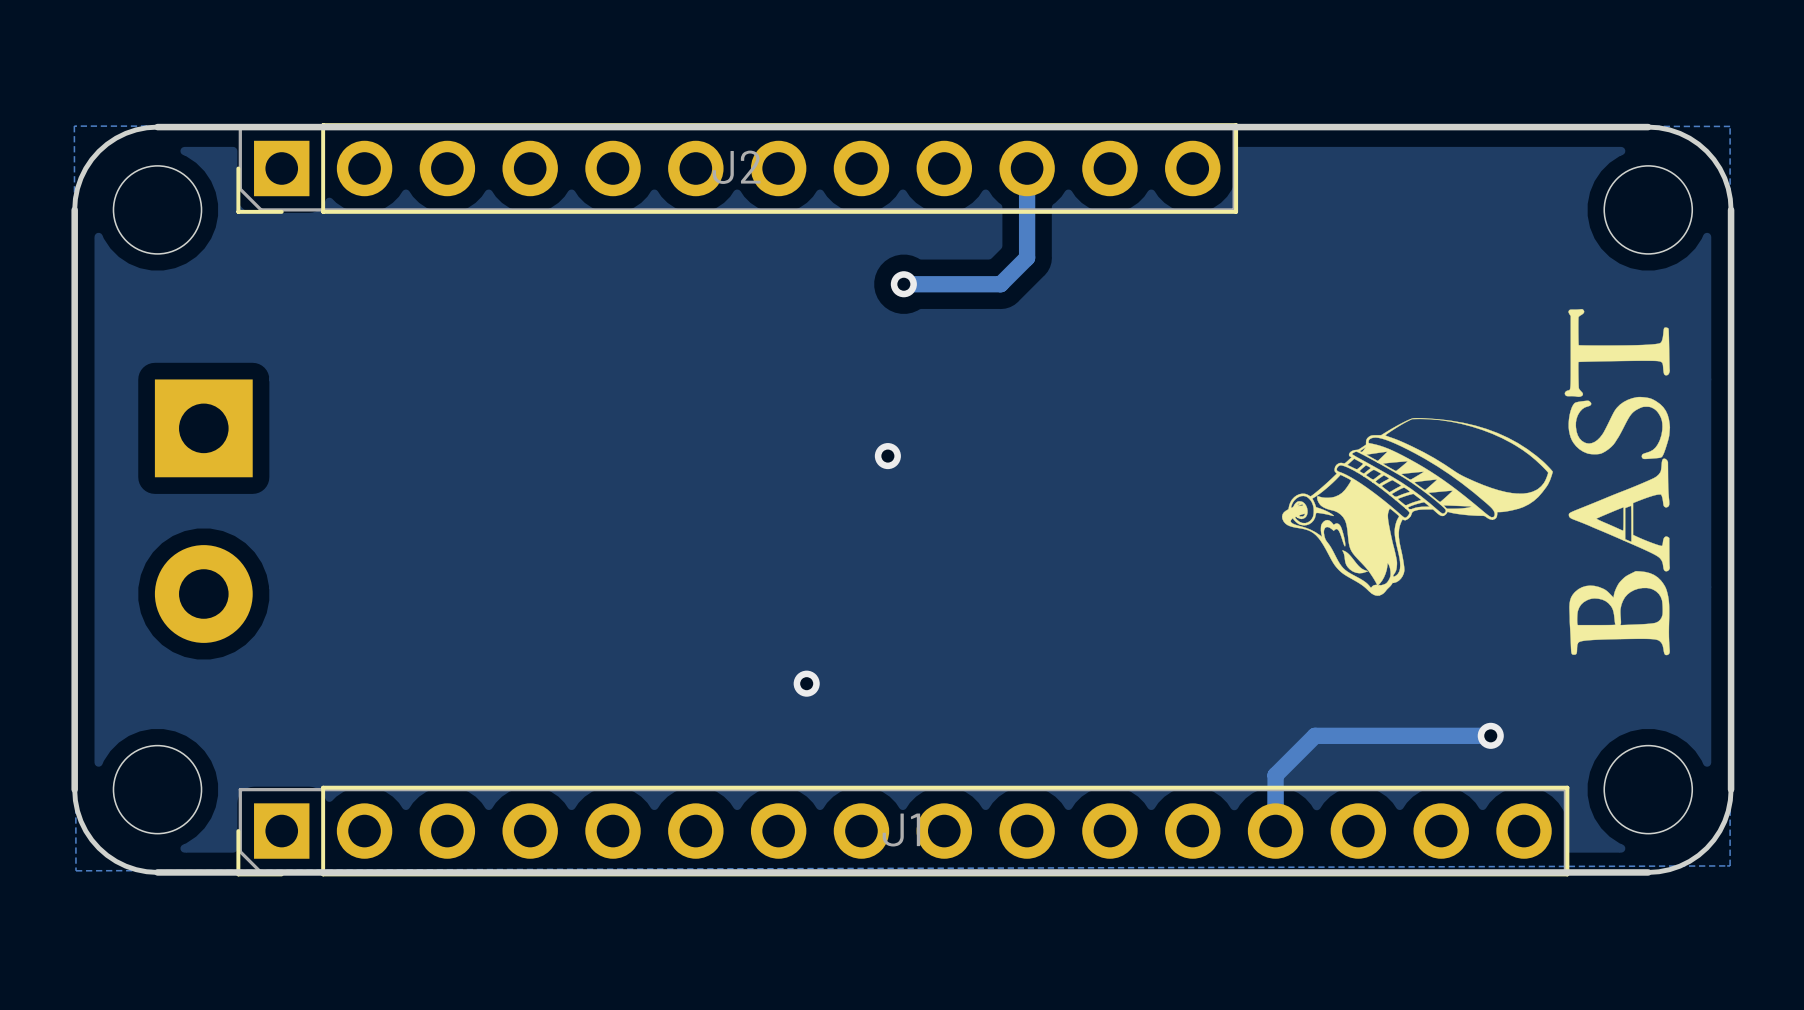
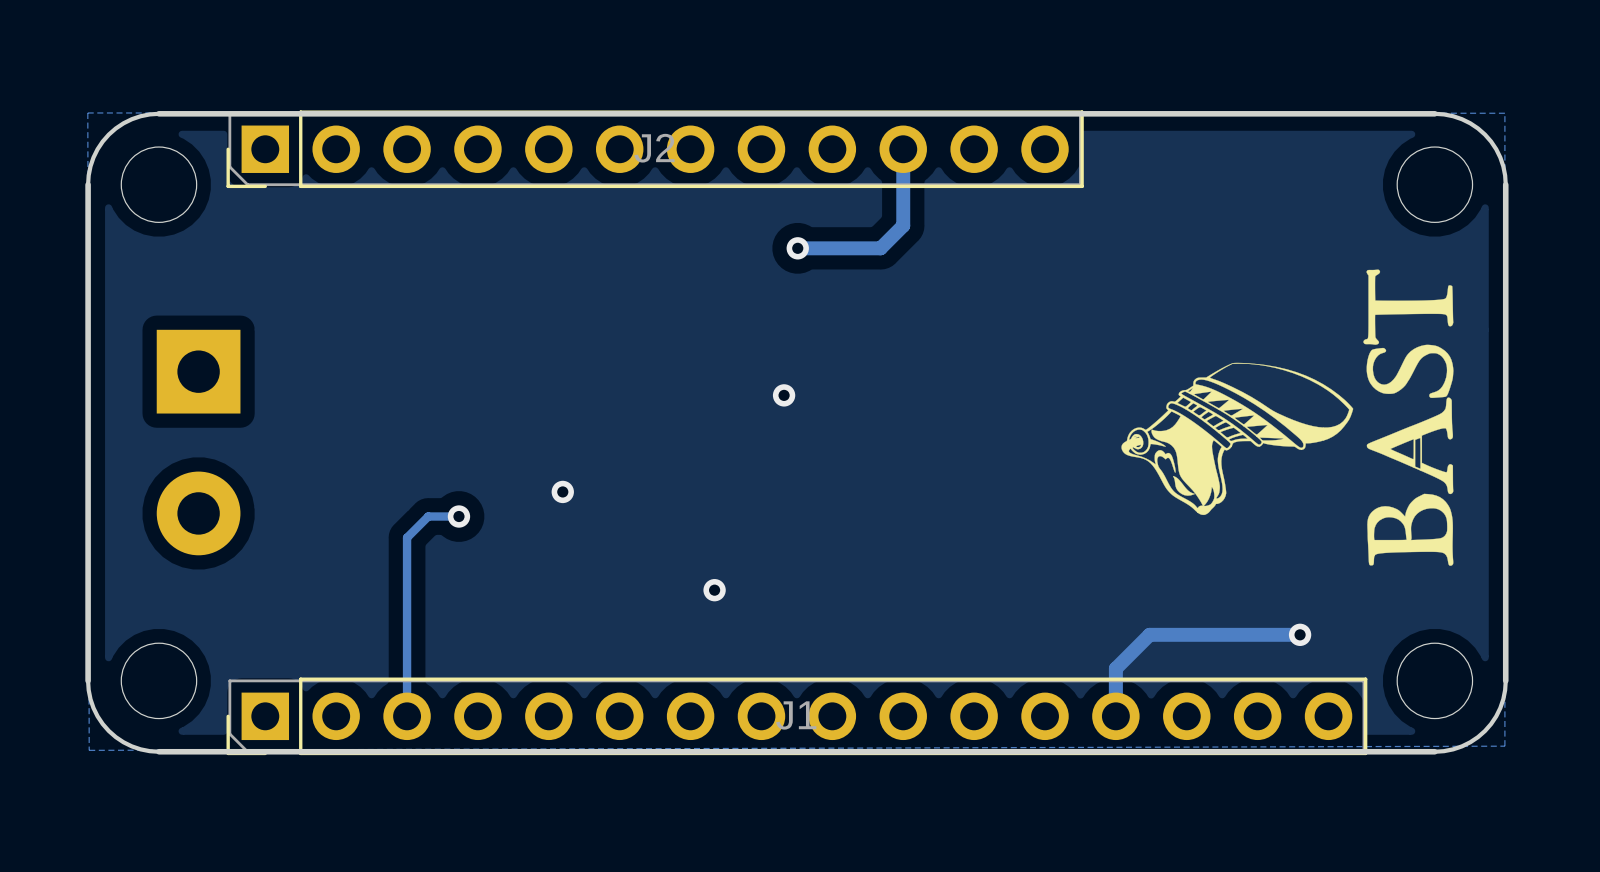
via: none -> (562, 491)
track: none -> (458, 516) (428, 516) (407, 537) (407, 716)
via: none -> (458, 516)

